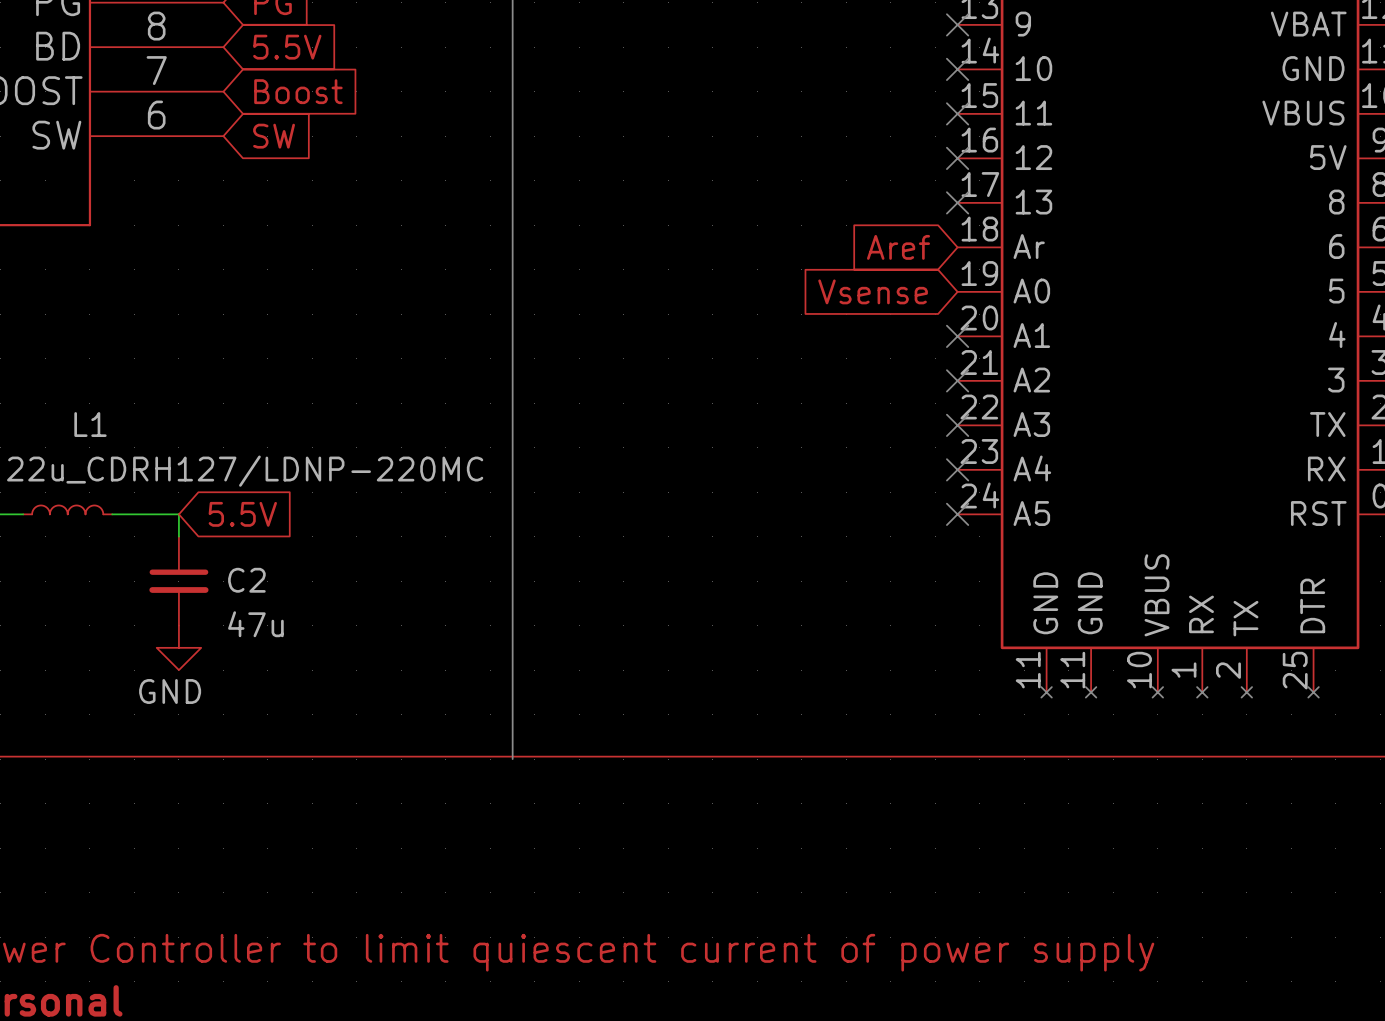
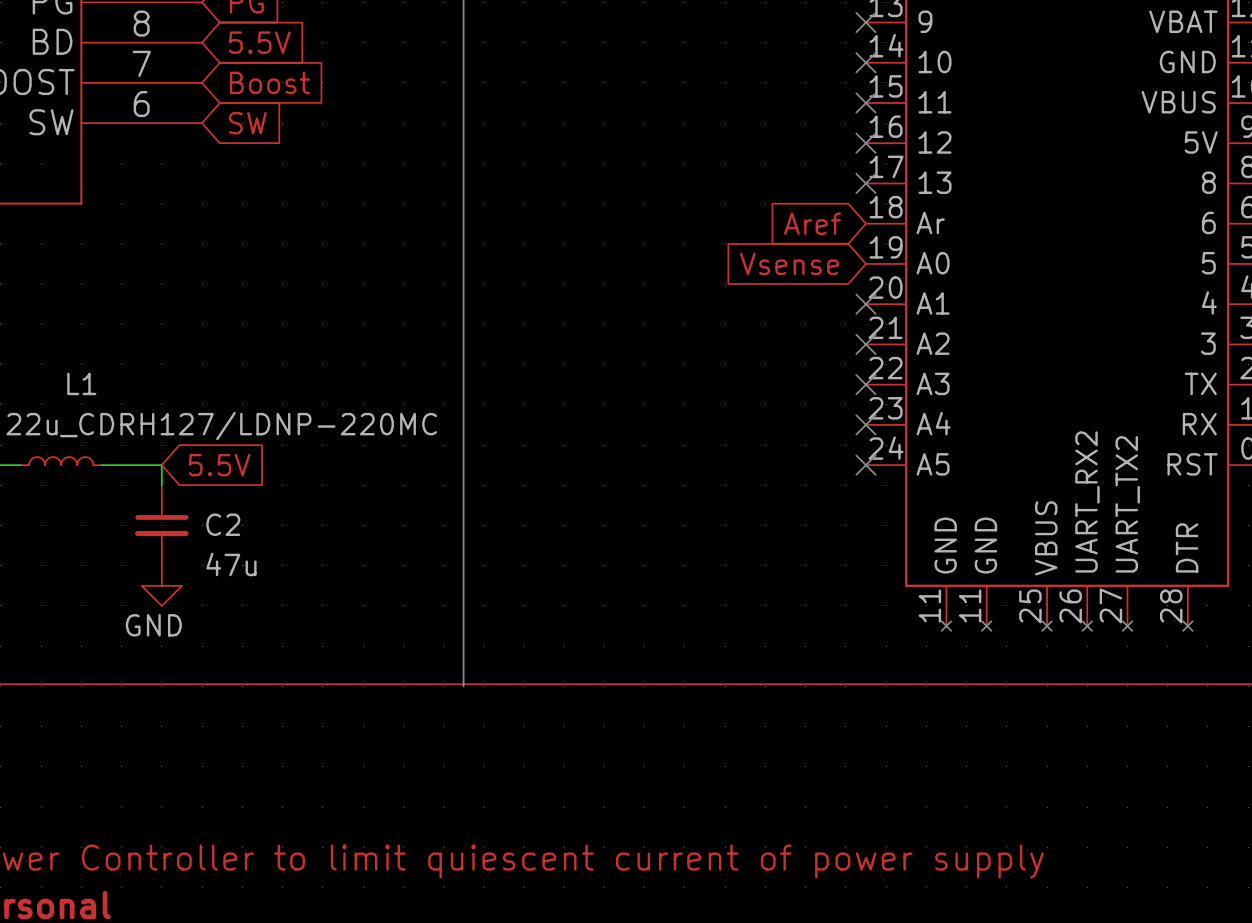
part pin name: RX (1201, 614) -> UART_RX2 (1087, 501)
part pin name: TX (1245, 618) -> UART_TX2 (1127, 504)
part pin number: 10 (1139, 670) -> 25 (1030, 606)
part pin number: 1 (1183, 670) -> 26 (1070, 606)
part pin number: 2 (1228, 670) -> 27 (1110, 605)
part pin number: 25 (1295, 670) -> 28 (1171, 606)

